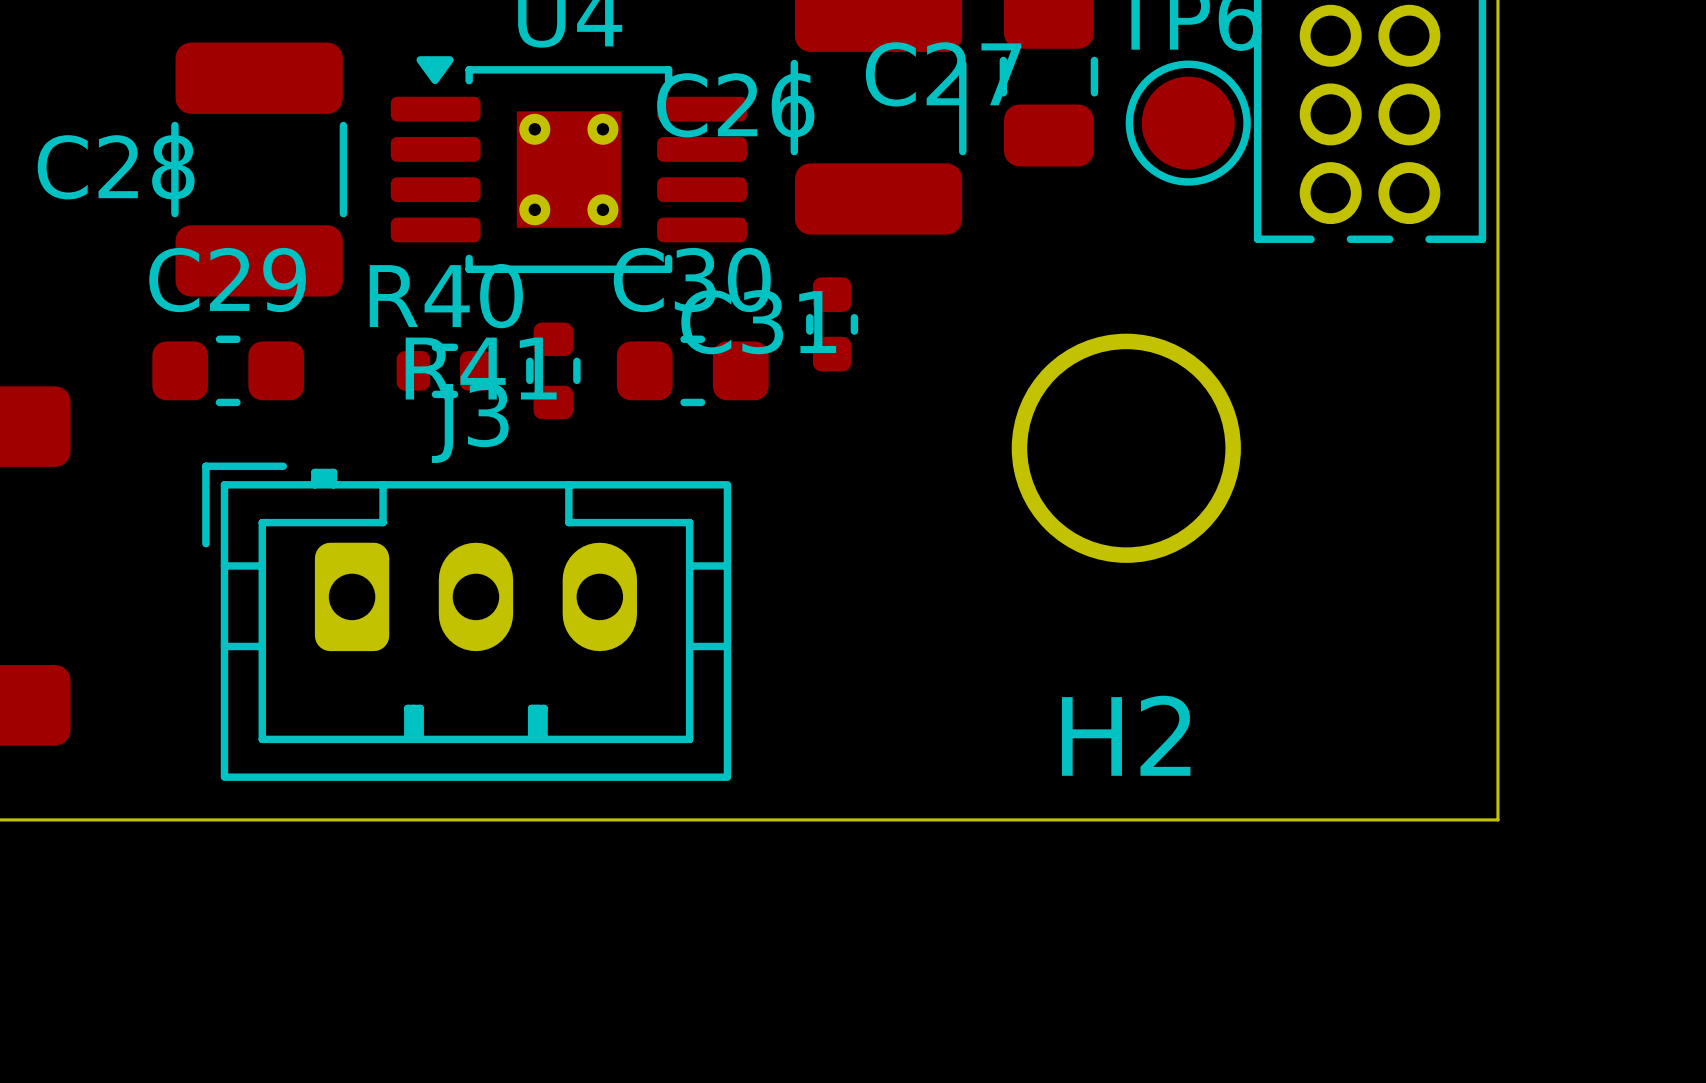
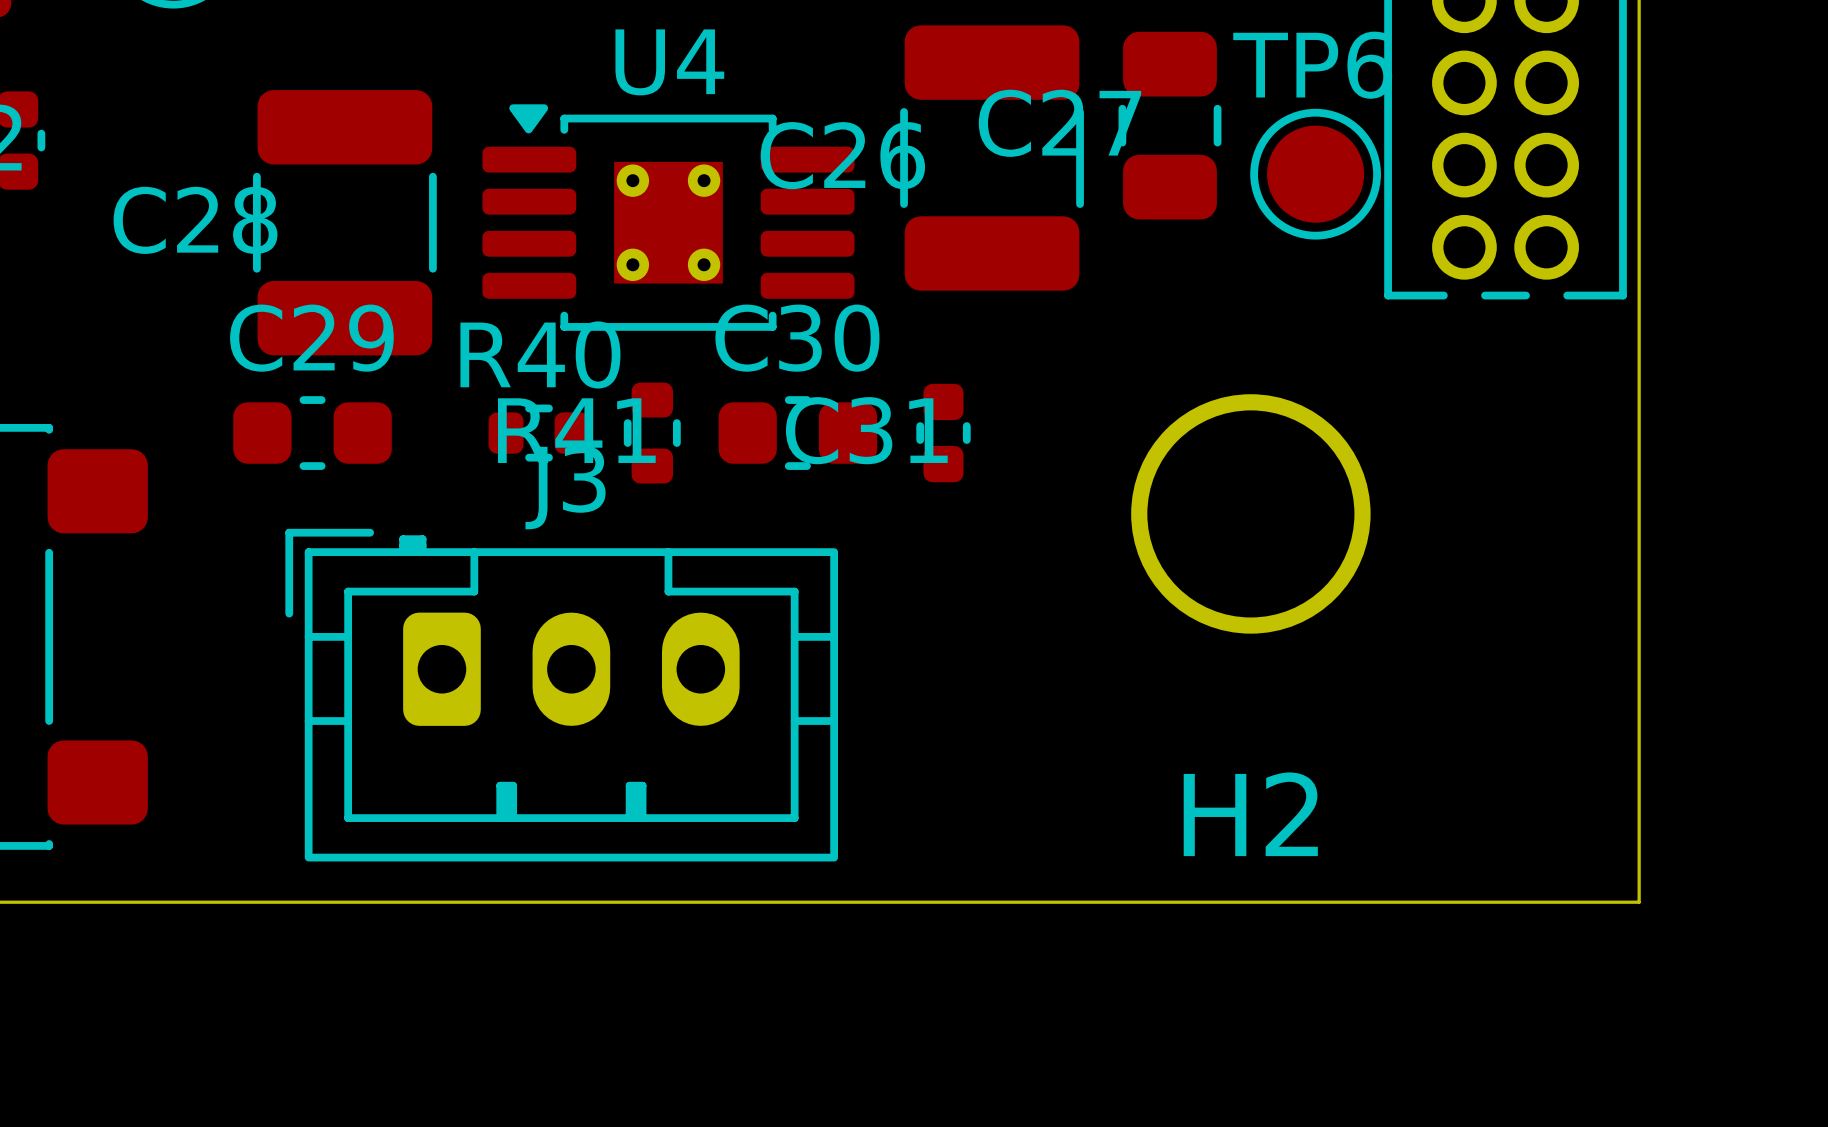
C31 position: (832, 324) -> (943, 433)

